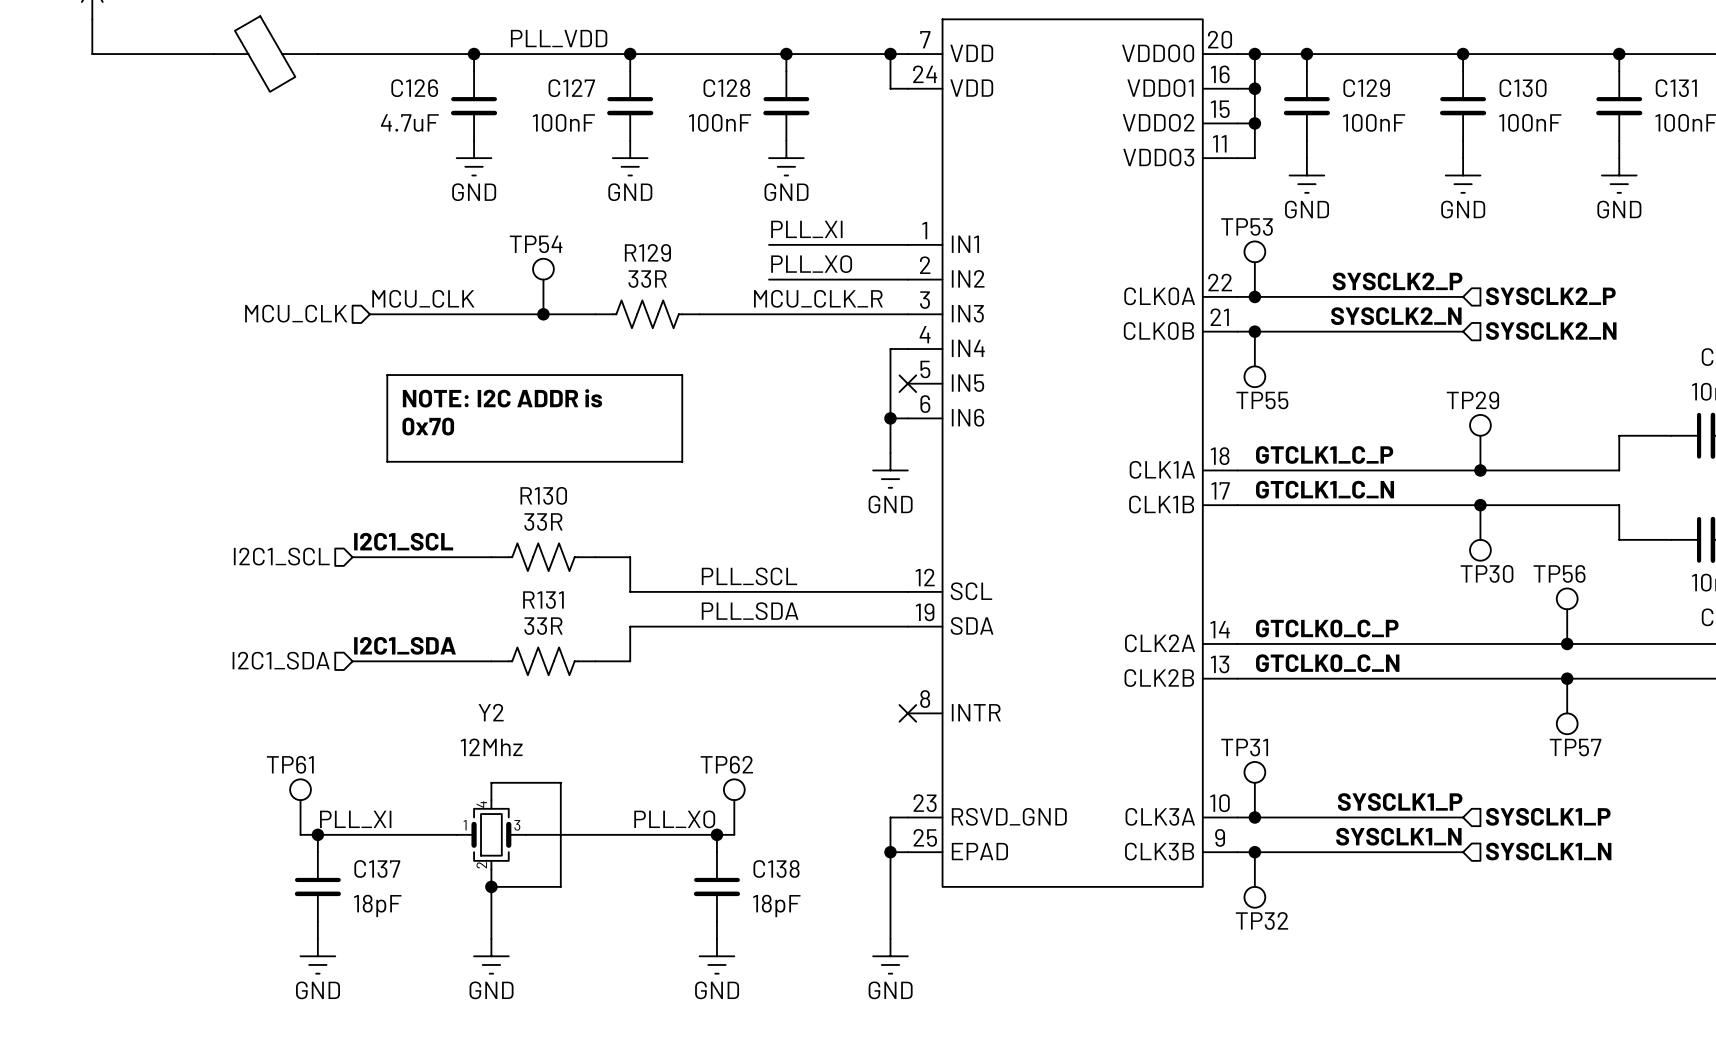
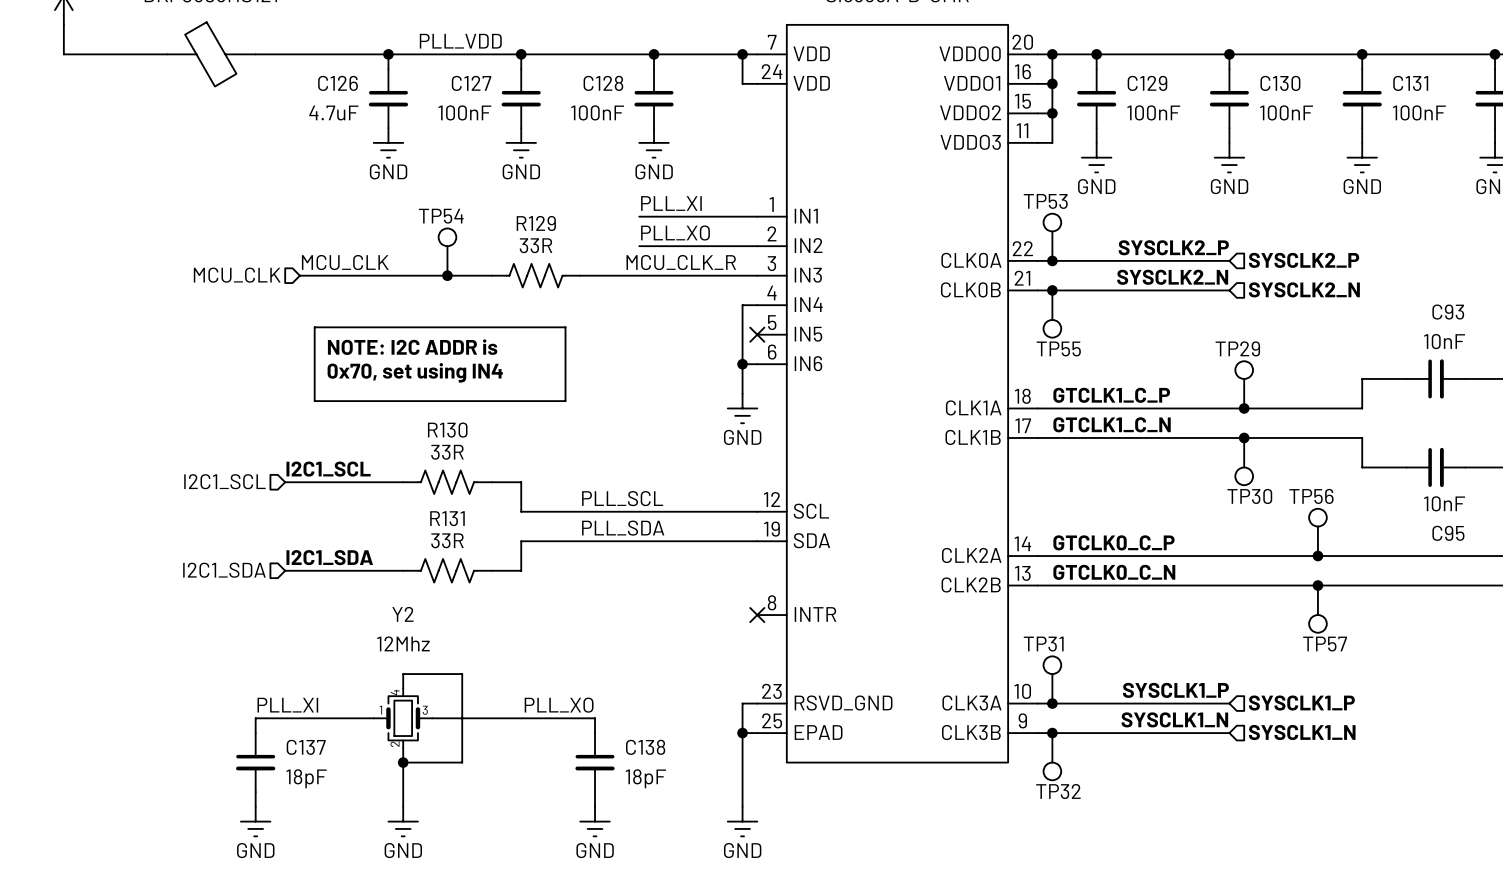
text: 0x70 (428, 426) -> 0x70, set using IN4 (415, 372)
TP61: (300, 807) -> none
TP62: (734, 807) -> none
wire: (300, 834) (317, 834) -> none
junction: (317, 834) -> none
wire: (716, 834) (734, 834) -> none
junction: (716, 834) -> none

